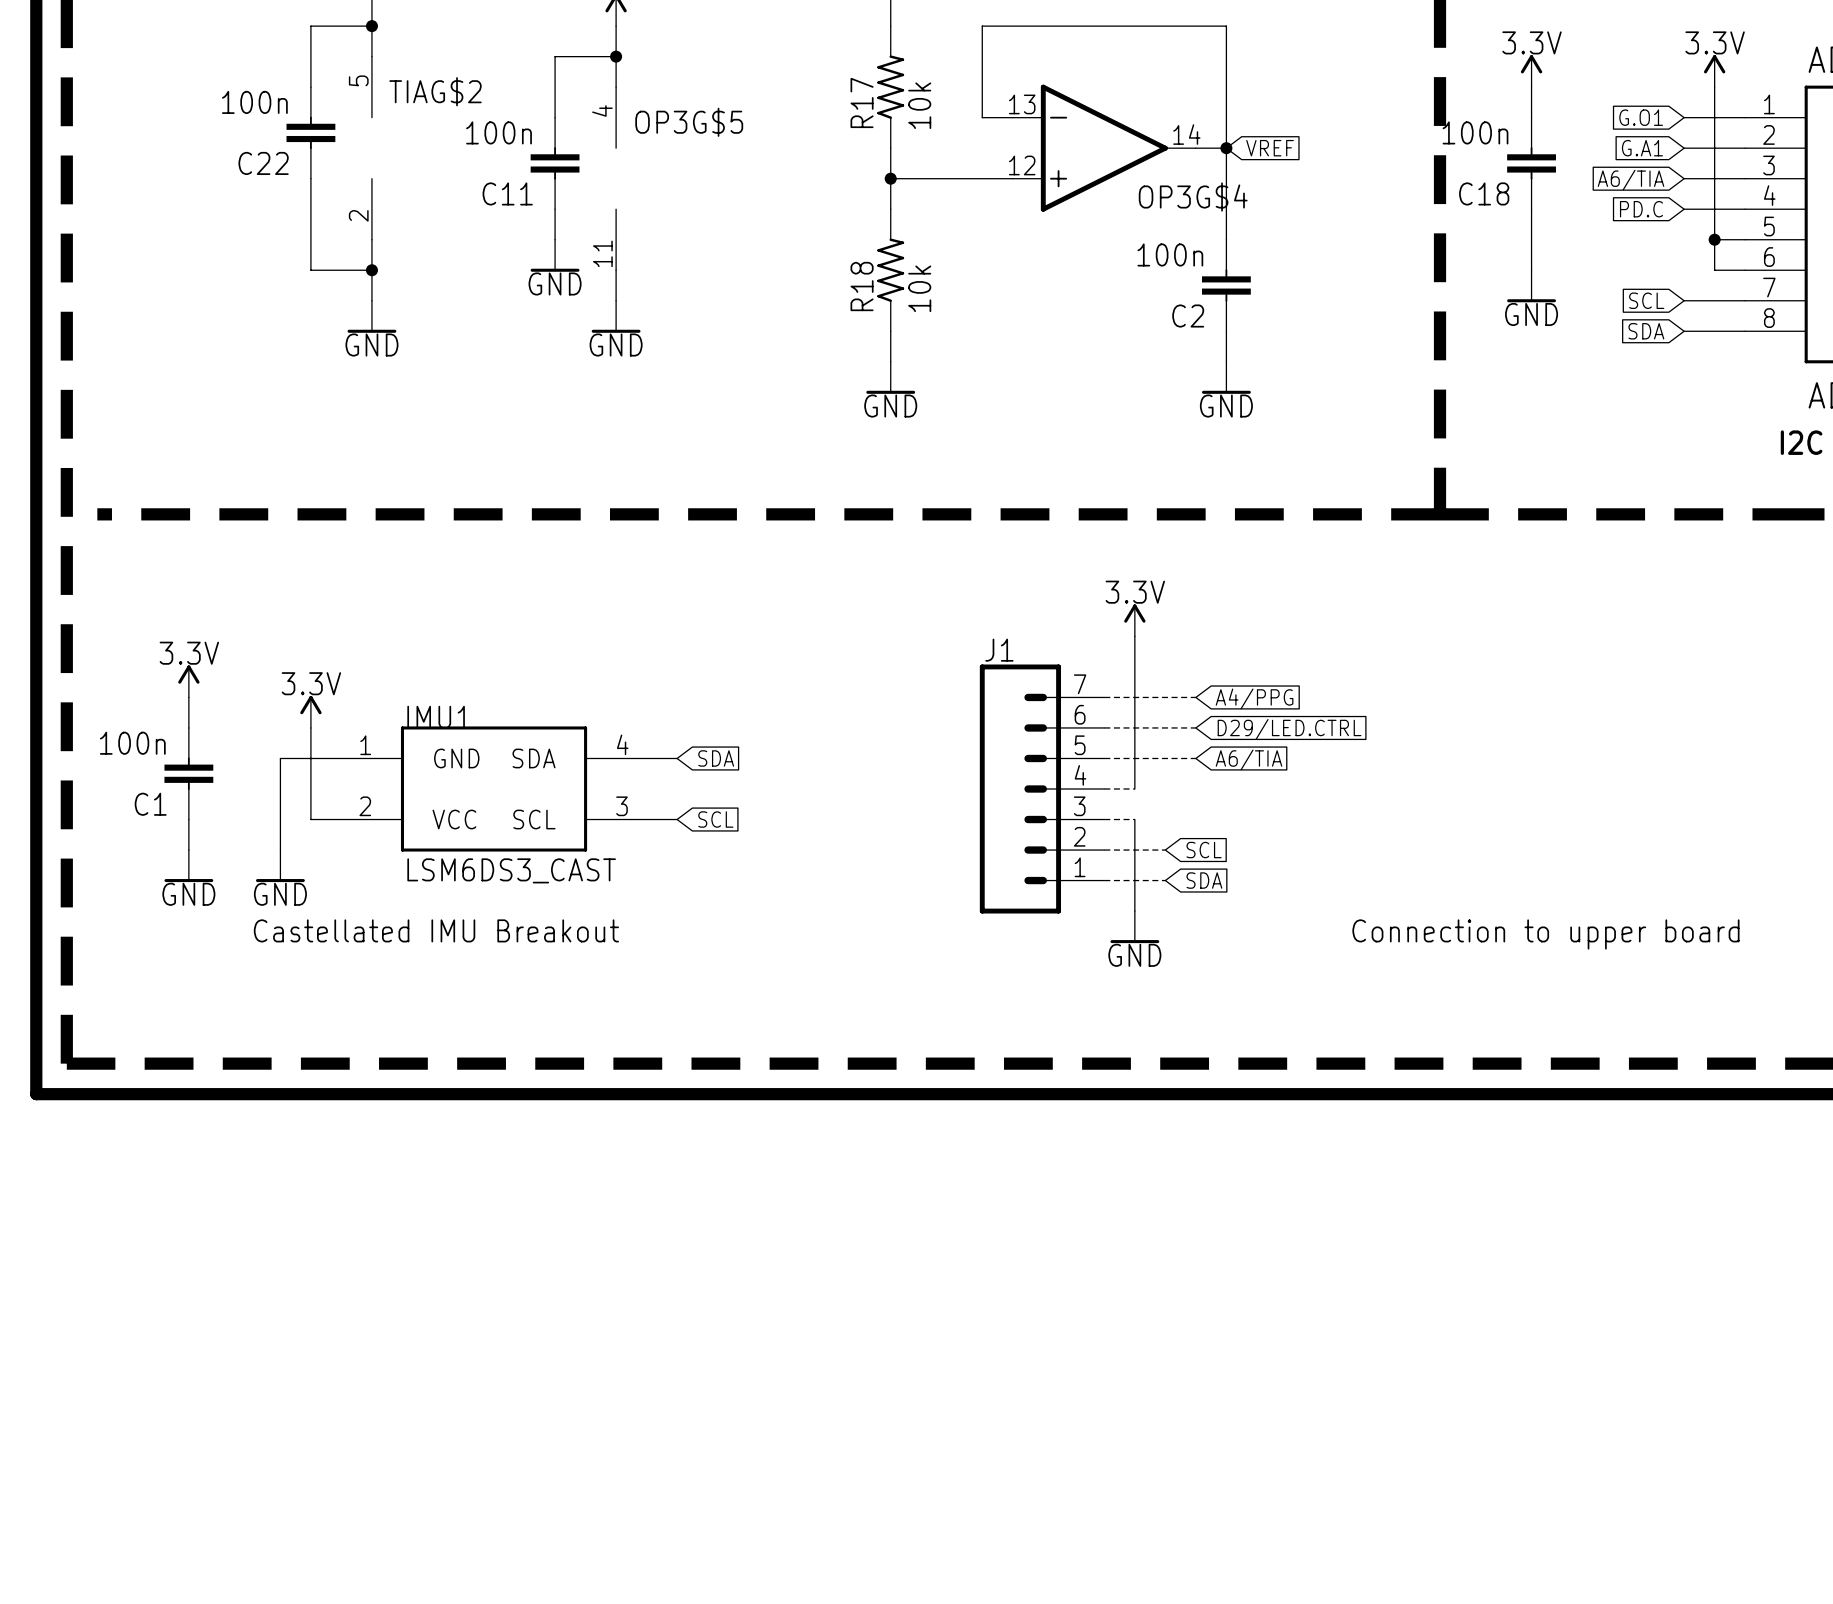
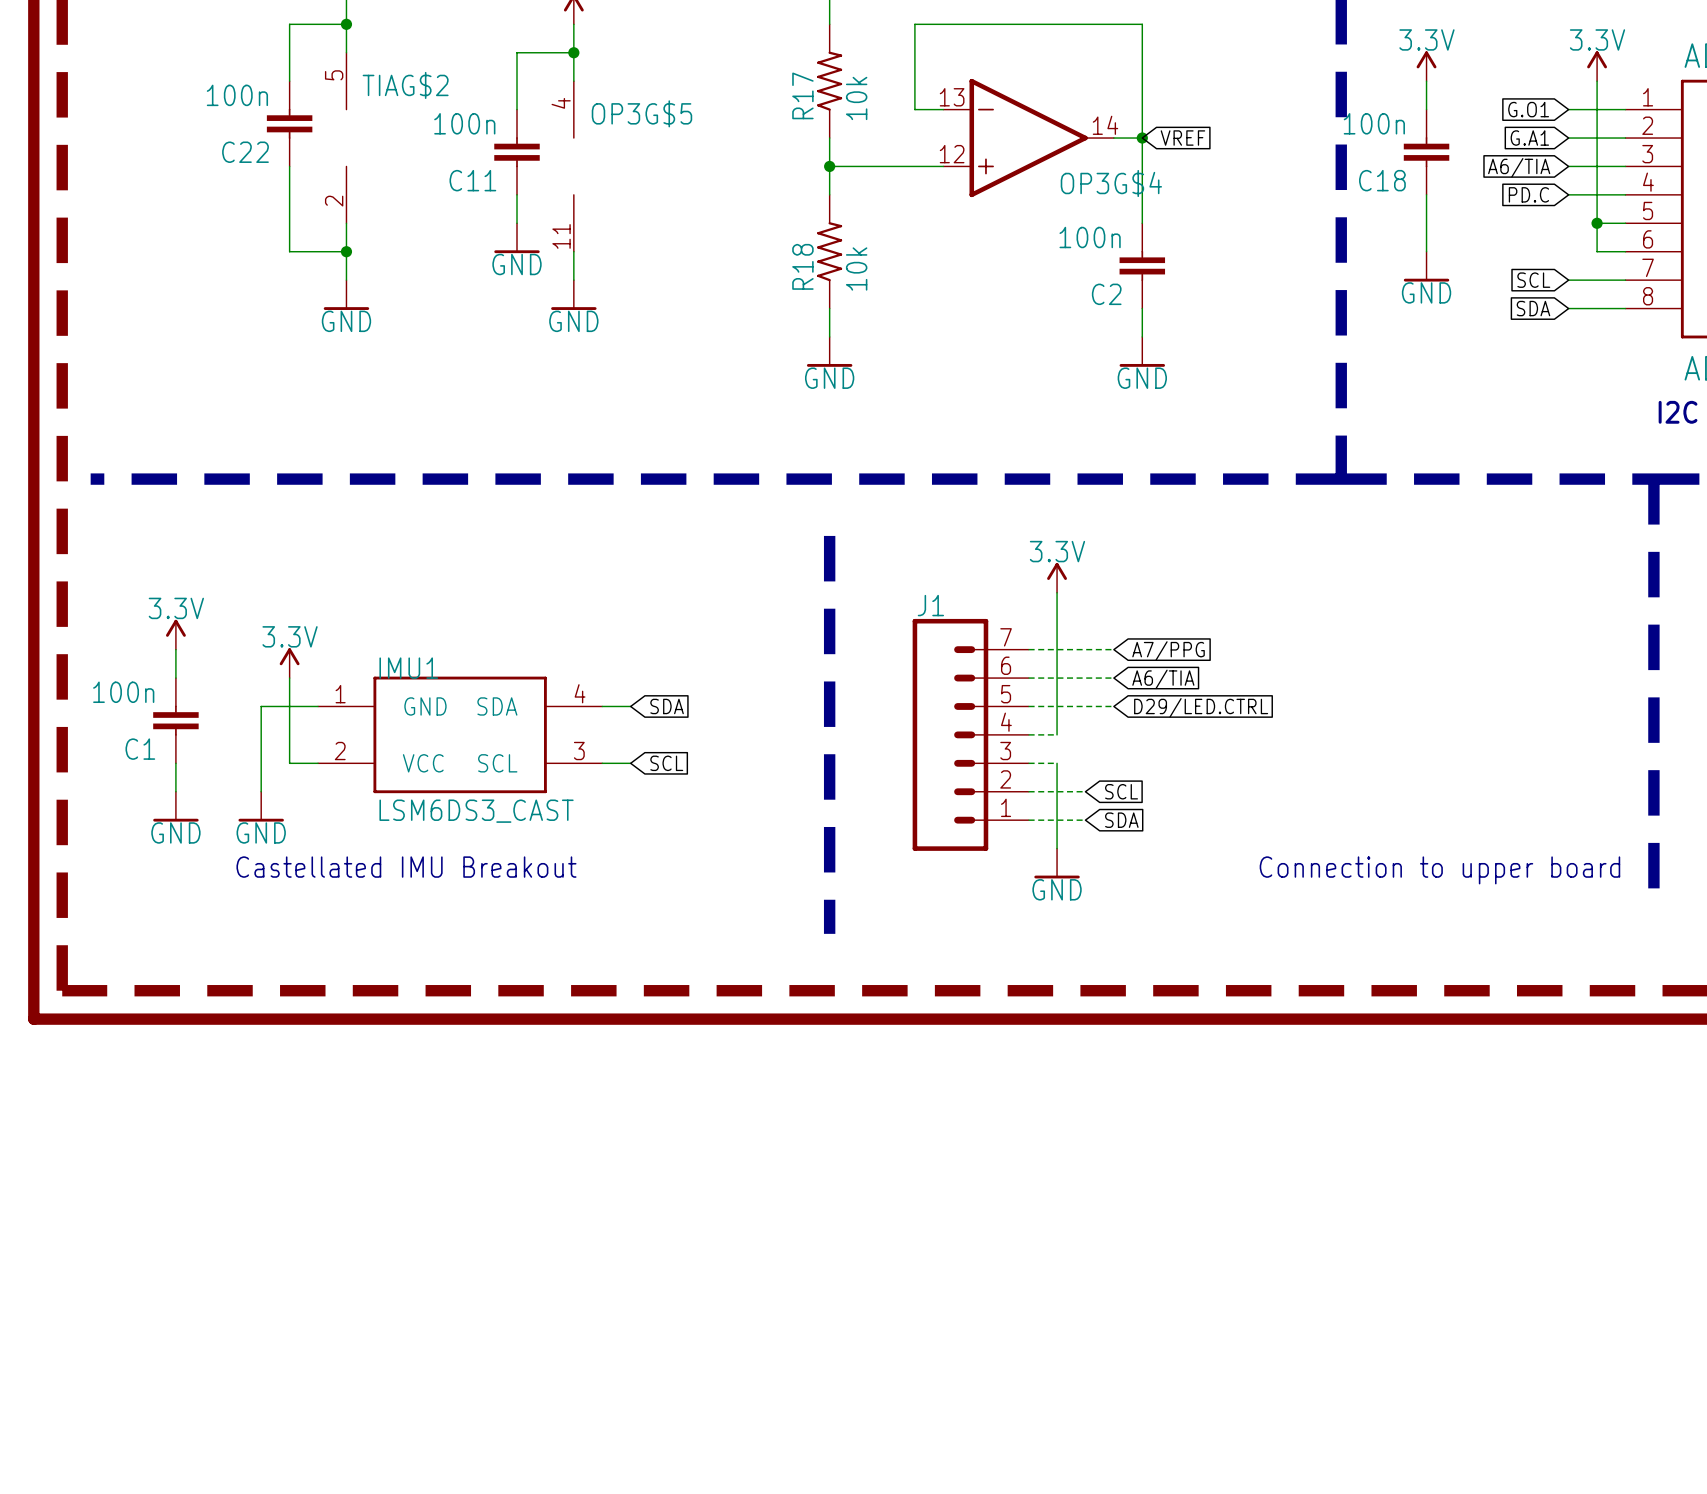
line: none -> (1653, 479) (1653, 905)
line: none -> (829, 535) (829, 933)
global label: A4/PPG (1254, 698) -> A7/PPG (1168, 650)
global label: D29/LED.CTRL (1289, 729) -> A6/TIA (1163, 679)
global label: A6/TIA (1249, 759) -> D29/LED.CTRL (1201, 707)

